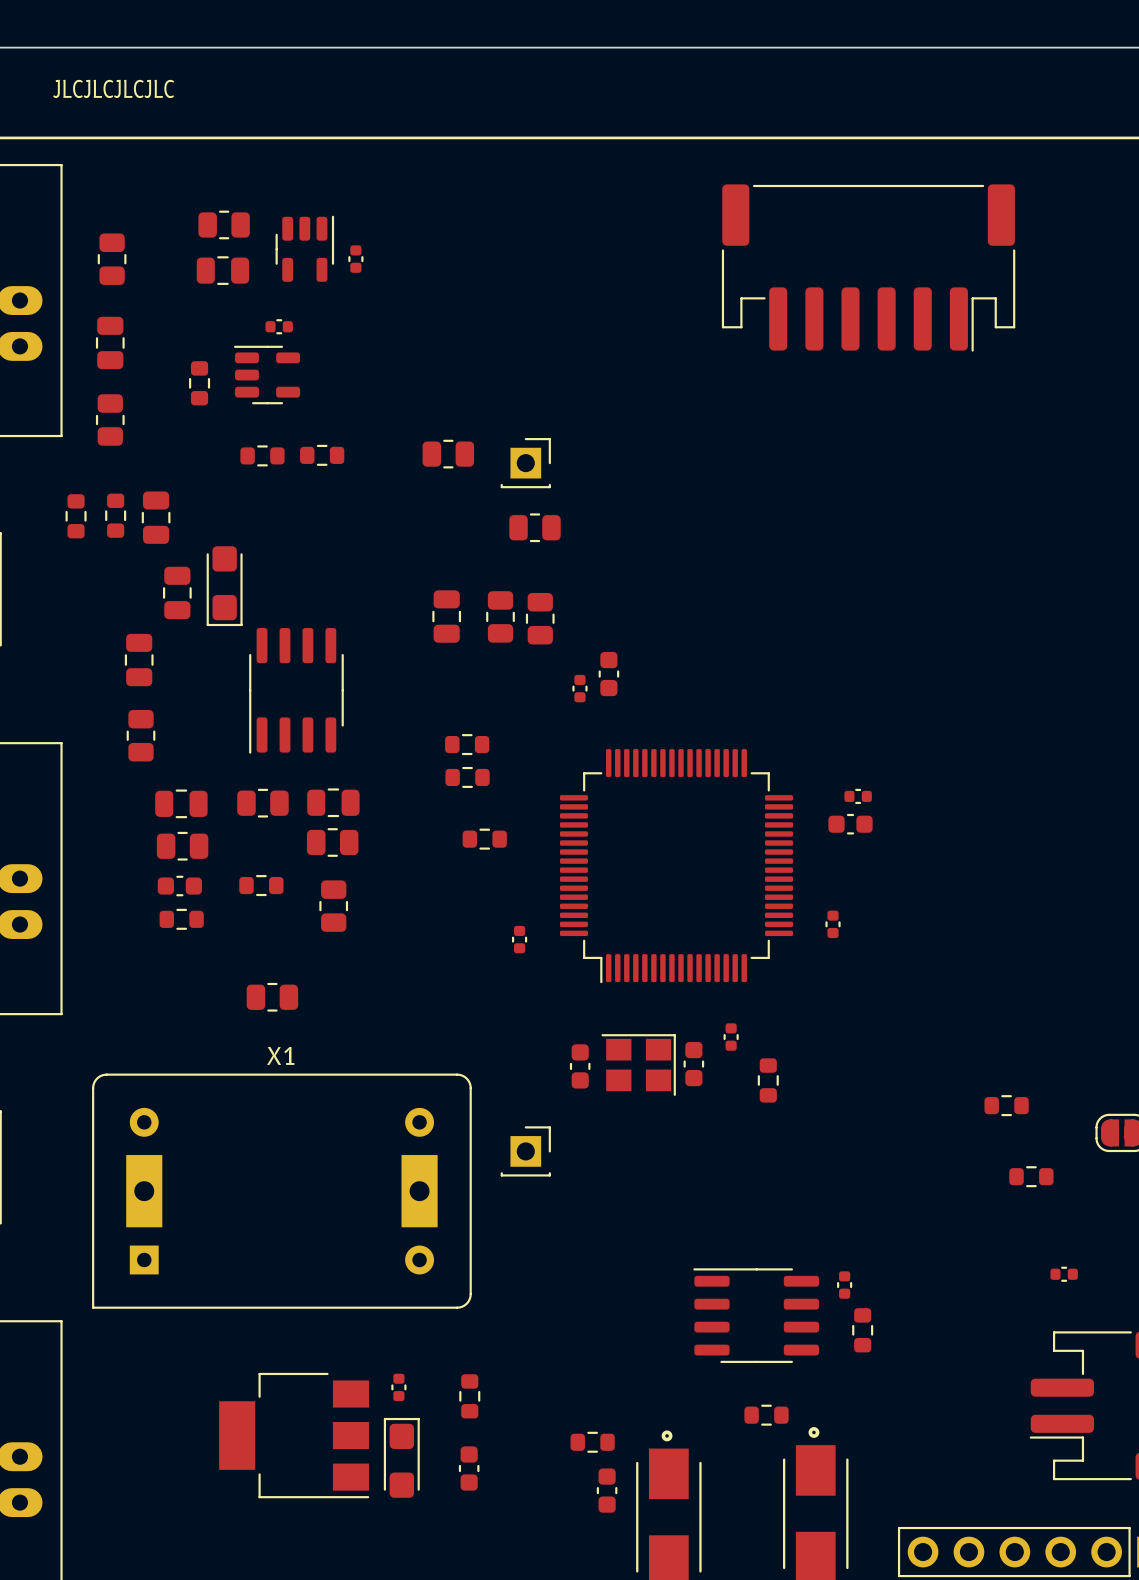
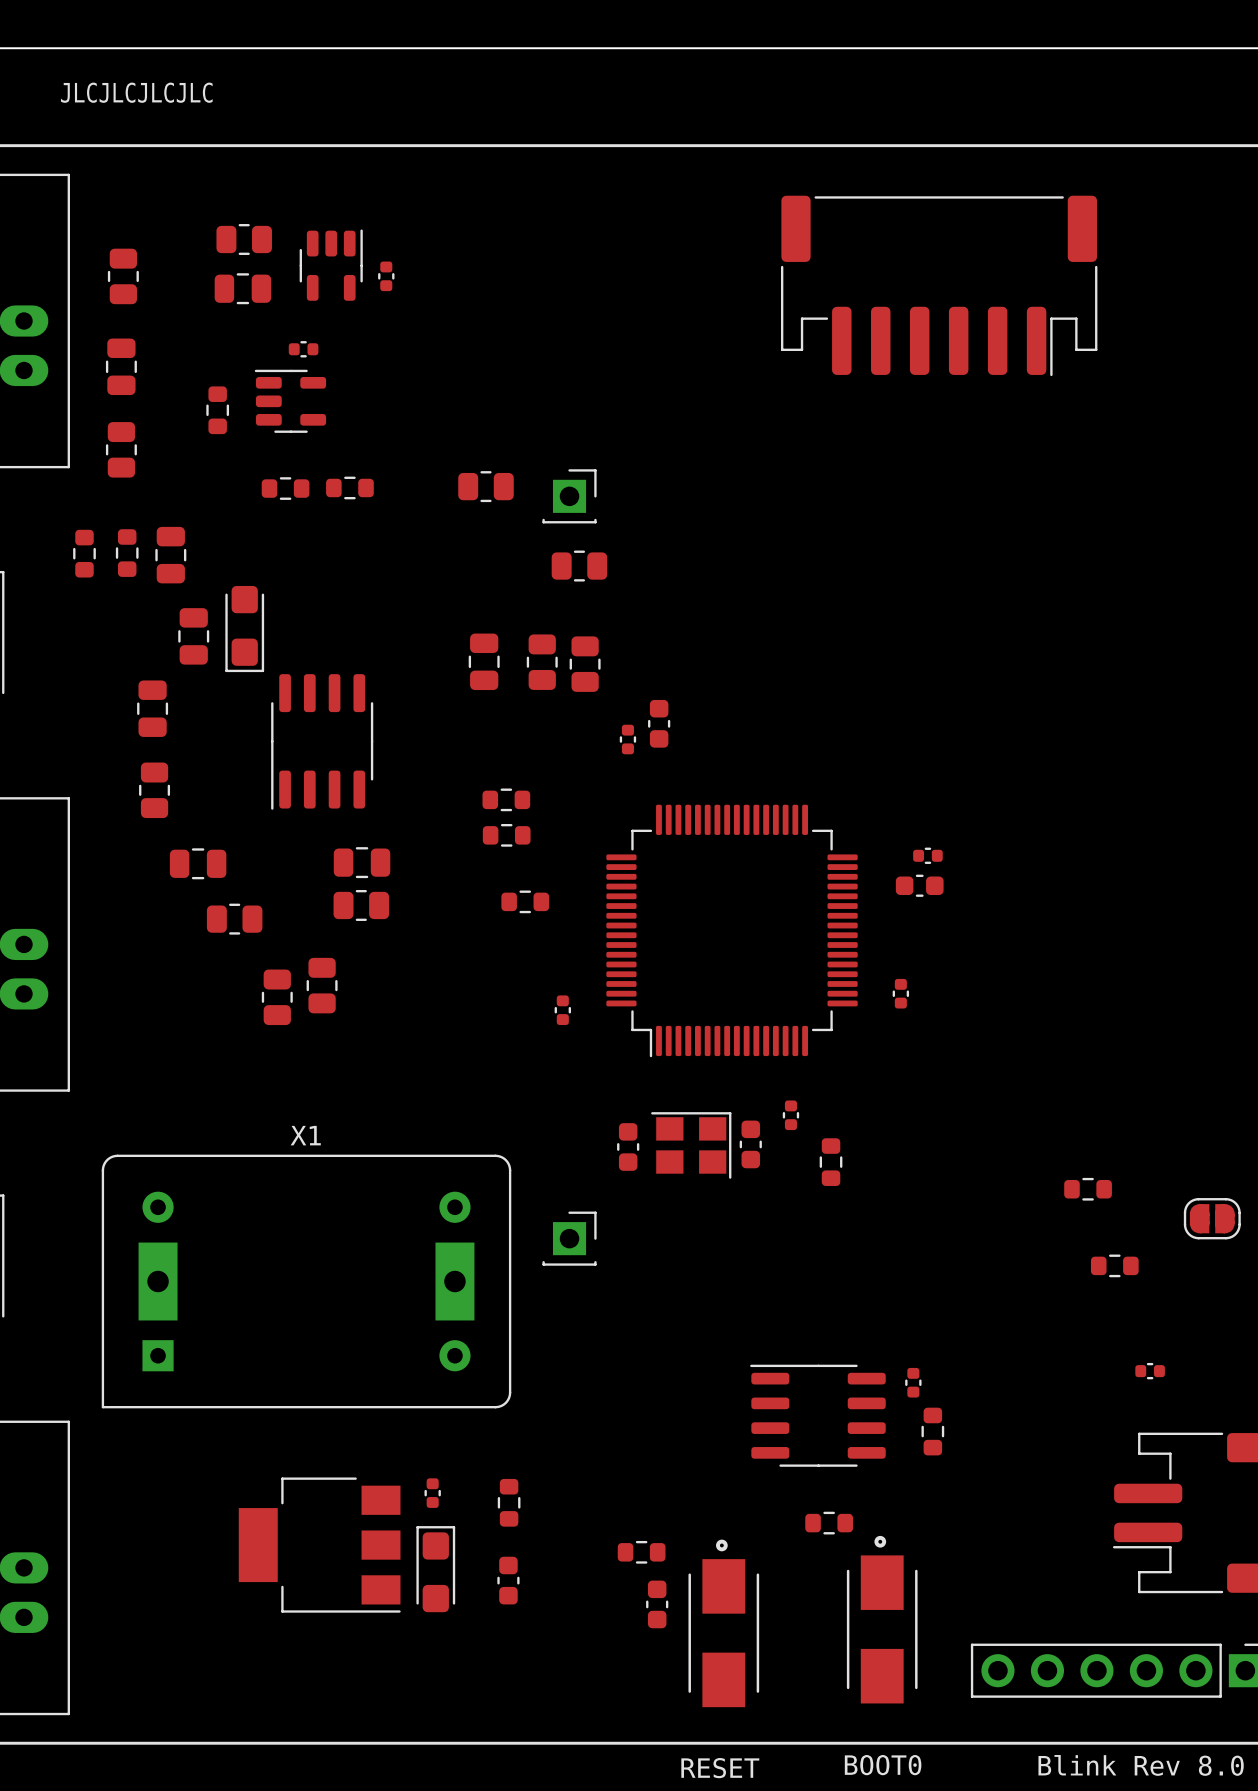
part: (262, 803) -> none
part position: (182, 846) -> (234, 919)
part: (261, 885) -> none
part: (179, 886) -> none
part position: (333, 906) -> (322, 985)
part: (181, 919) -> none
part: none -> (277, 997)
part: (272, 997) -> none

